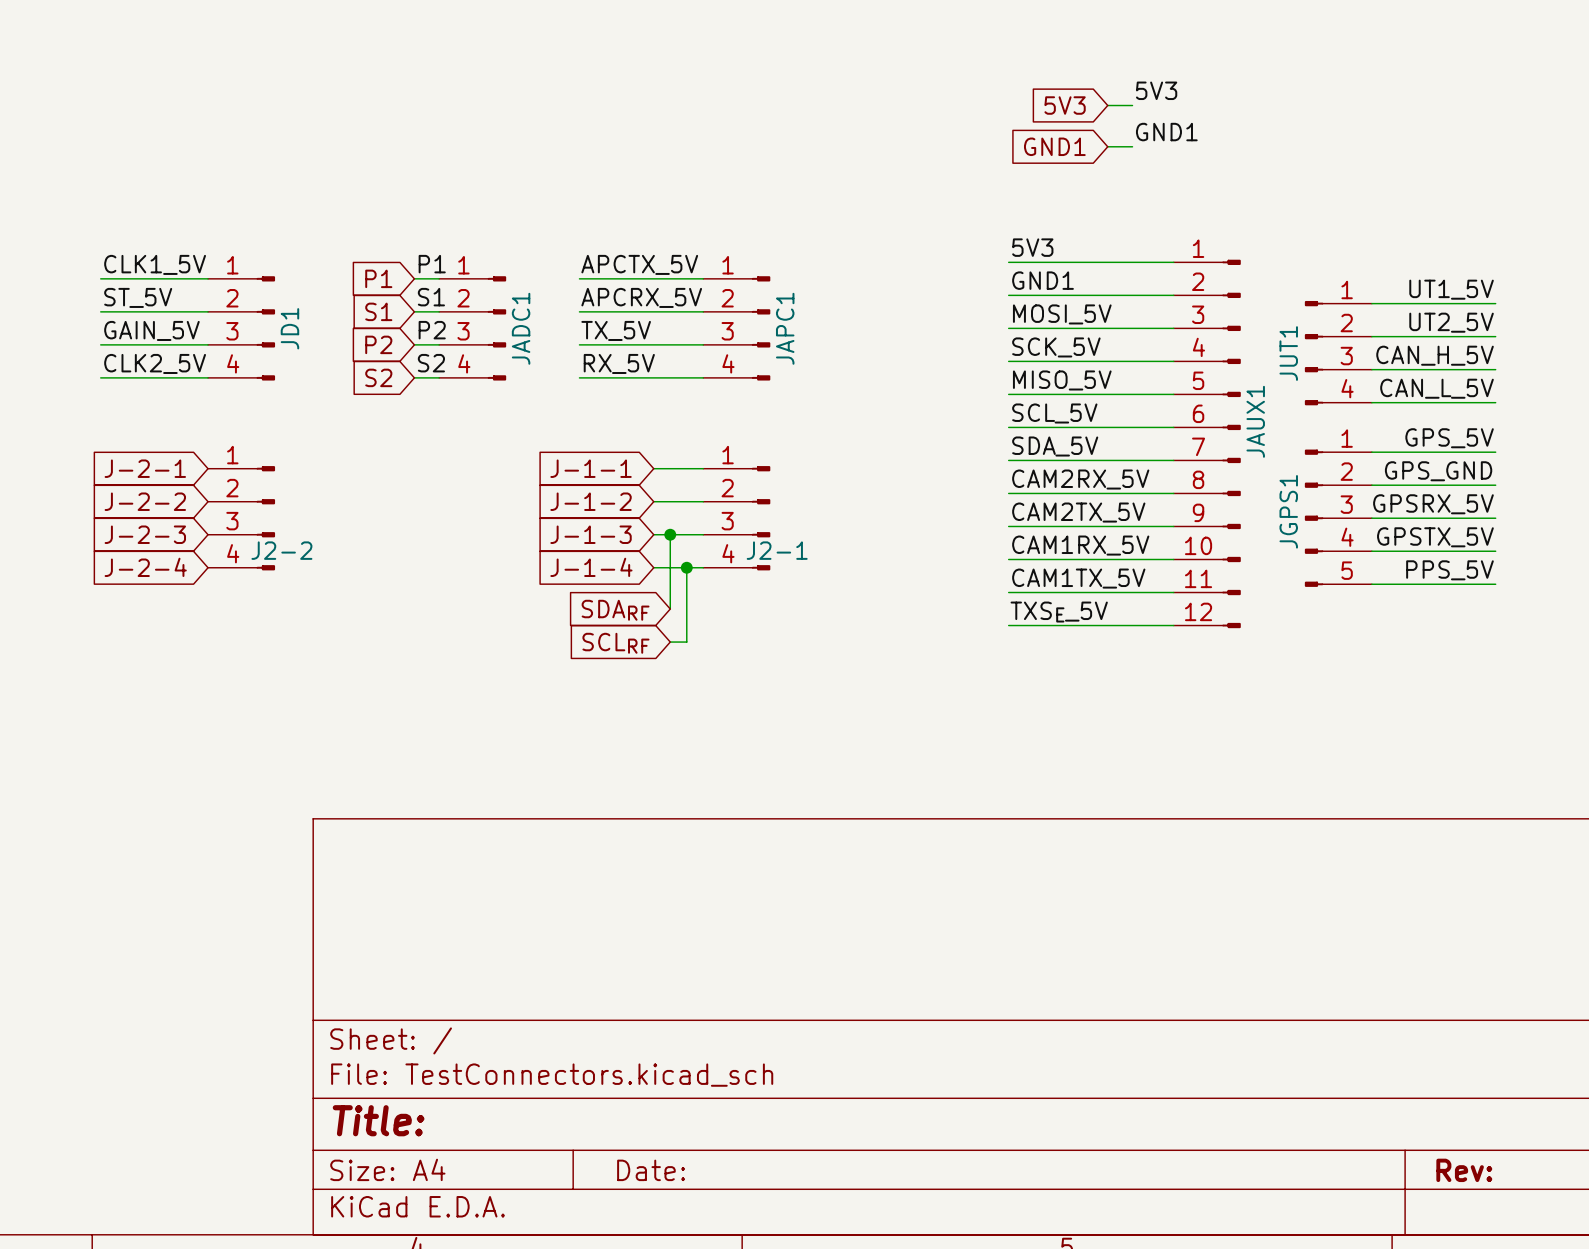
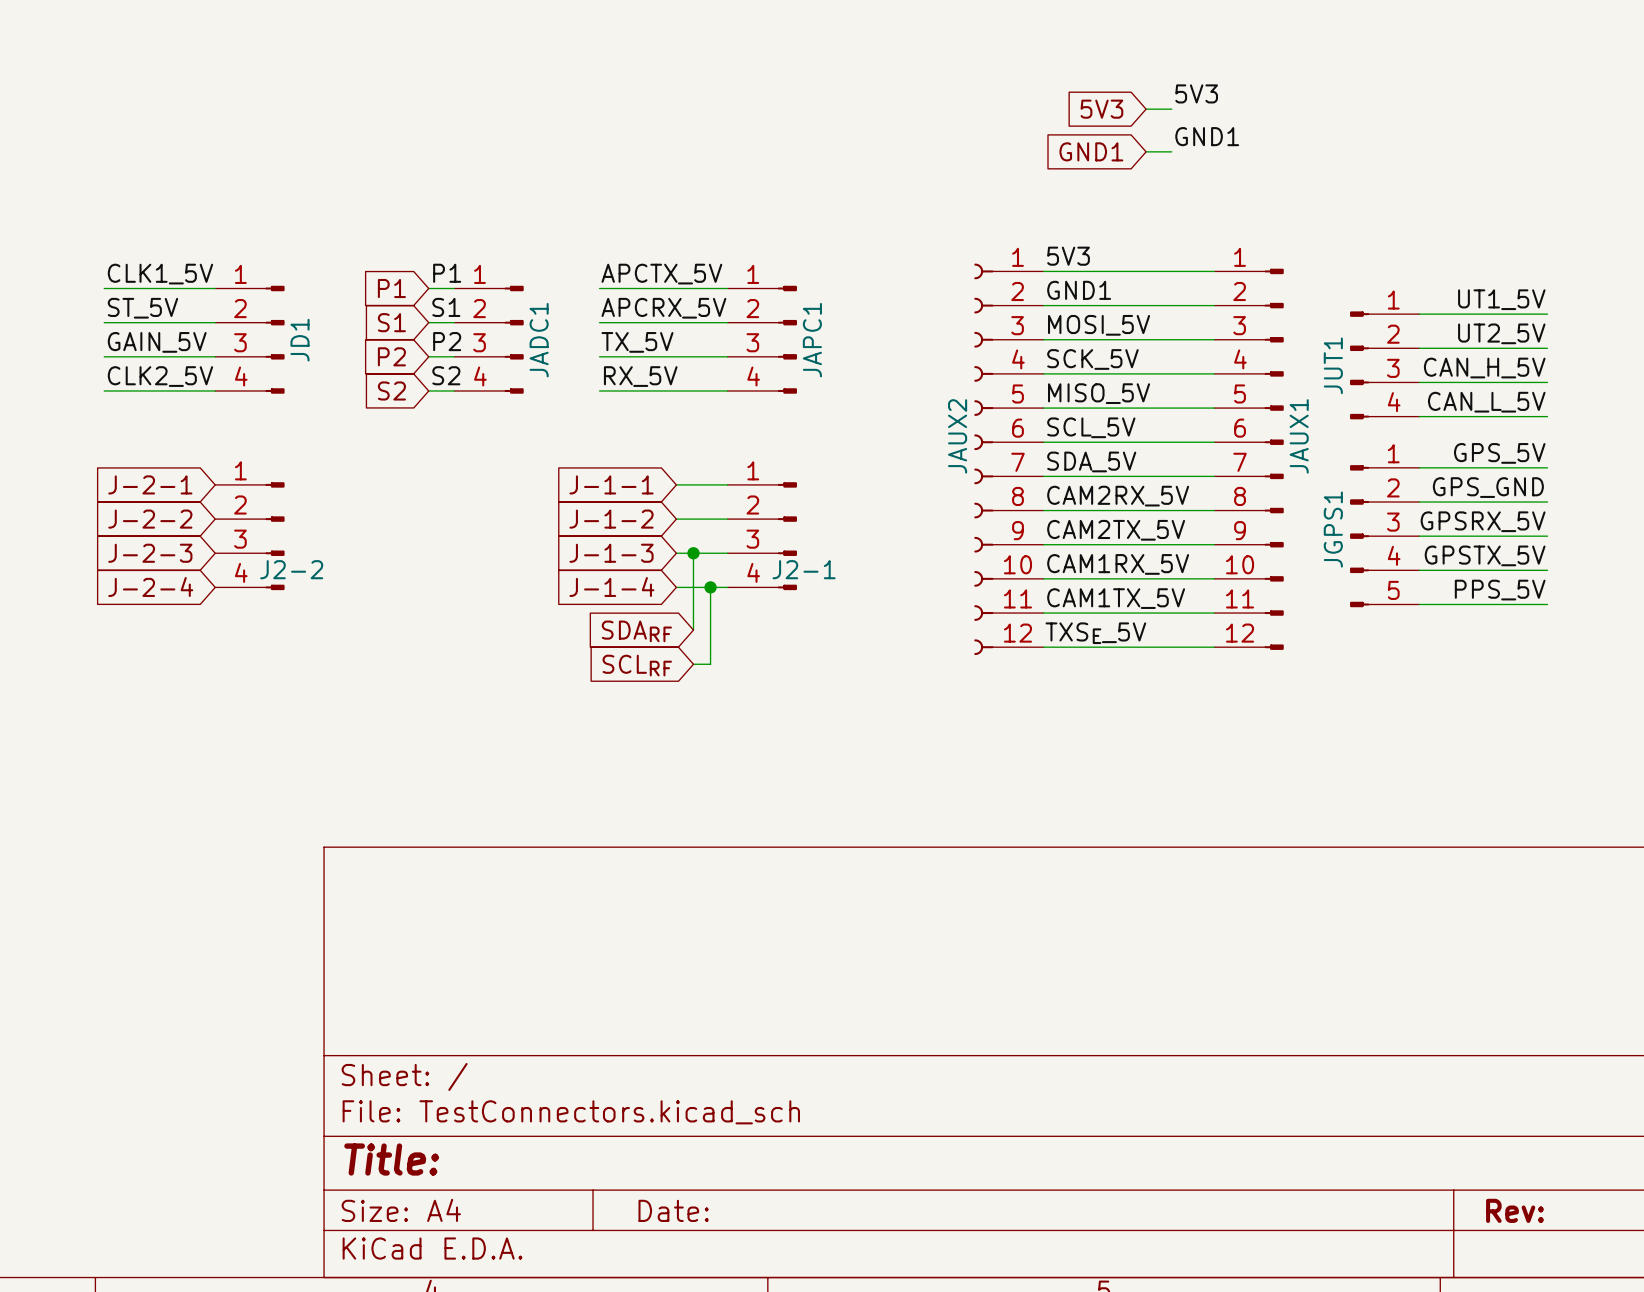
JAUX2: none -> (1008, 459)

